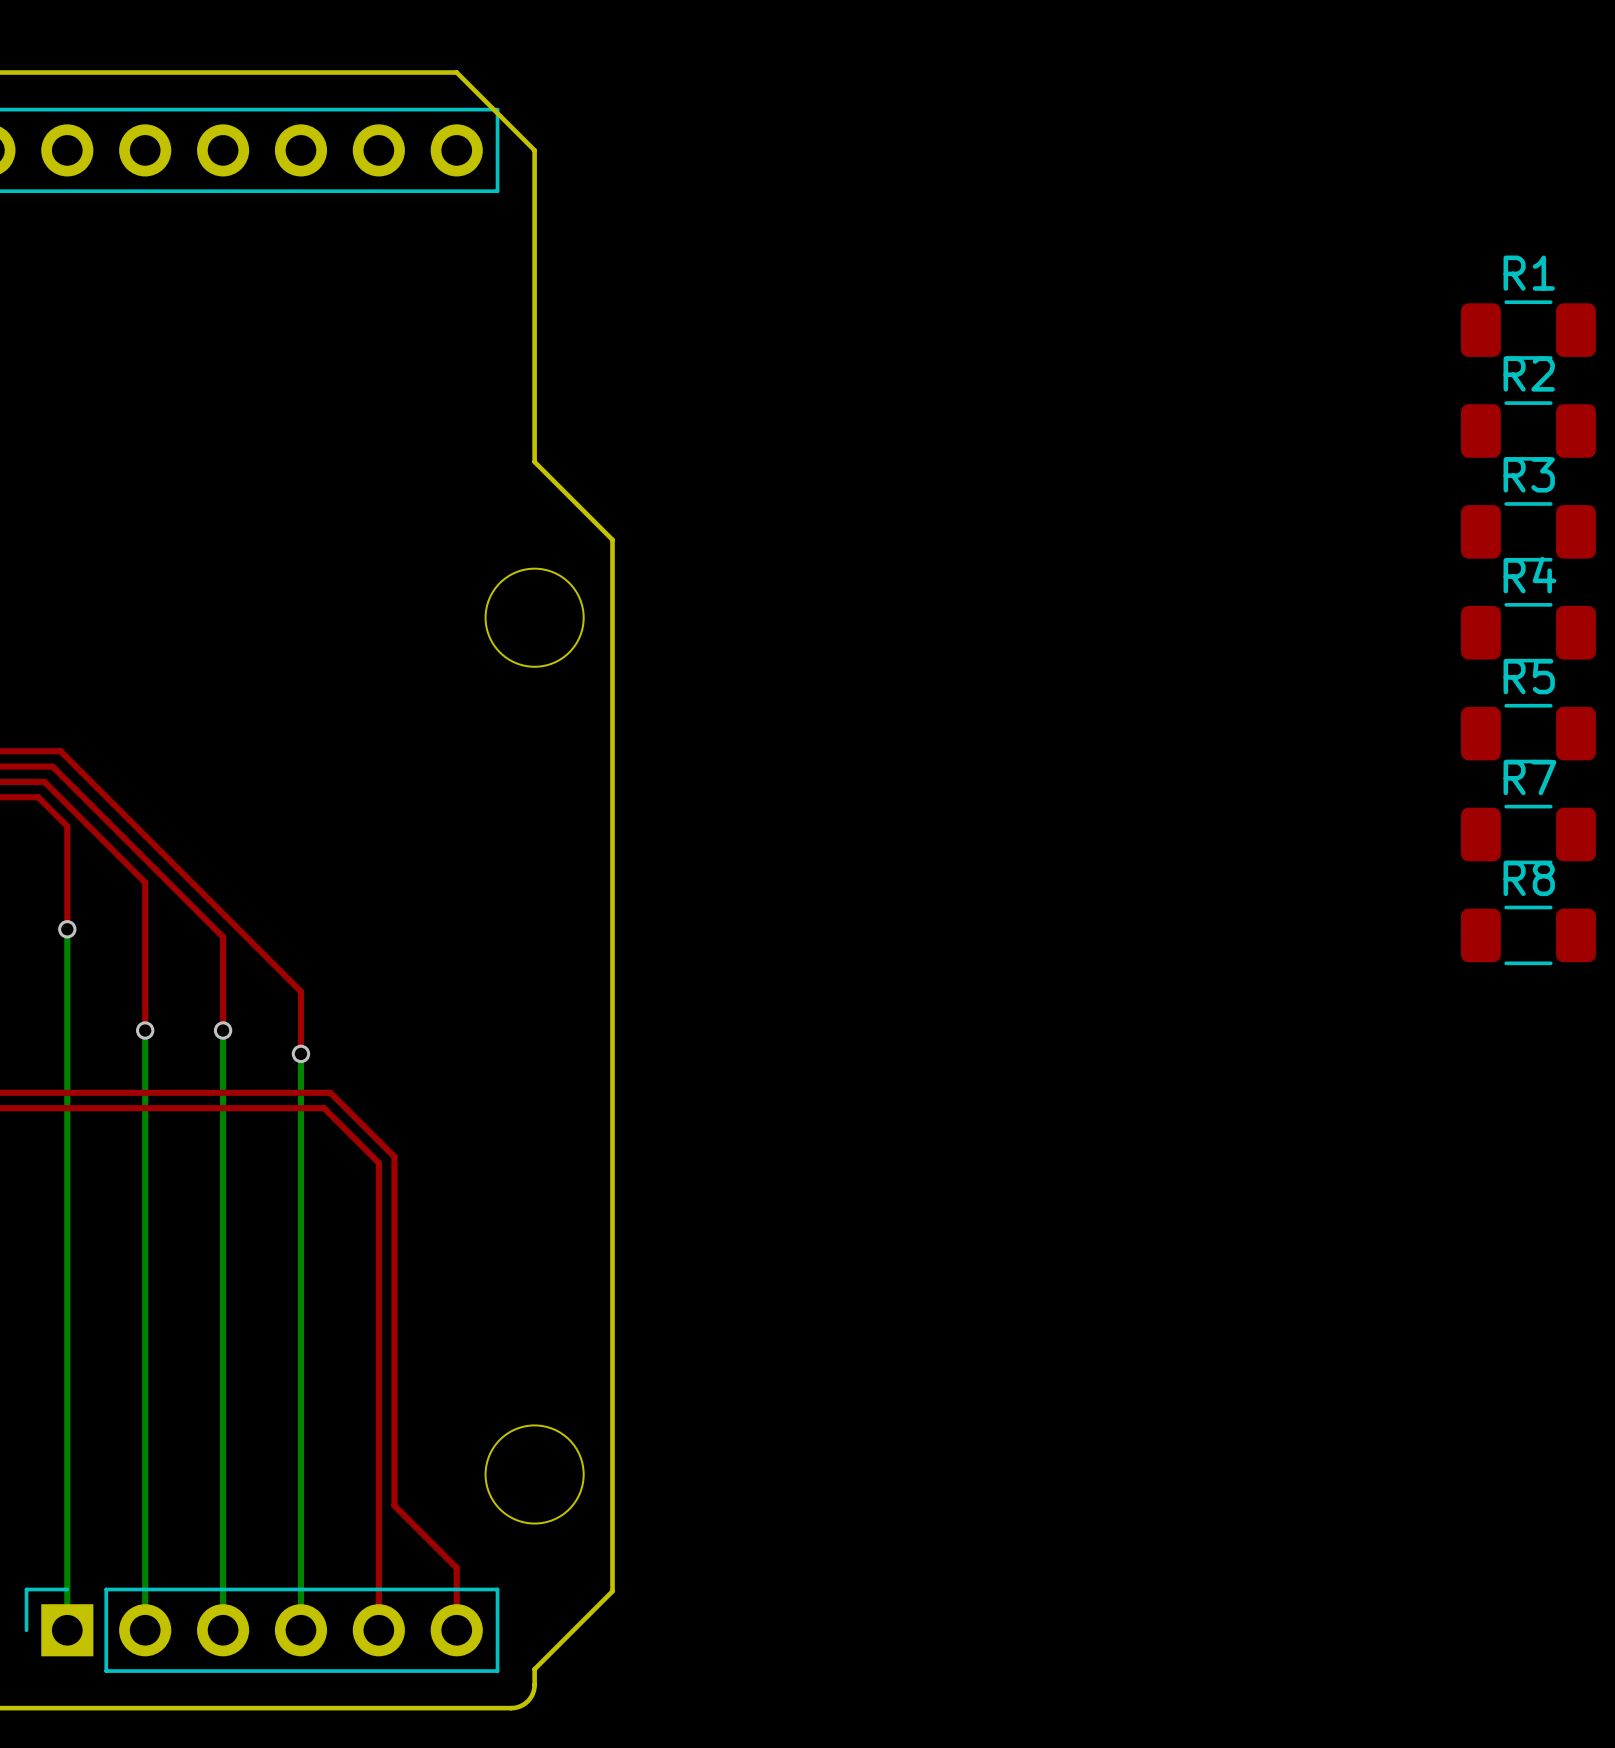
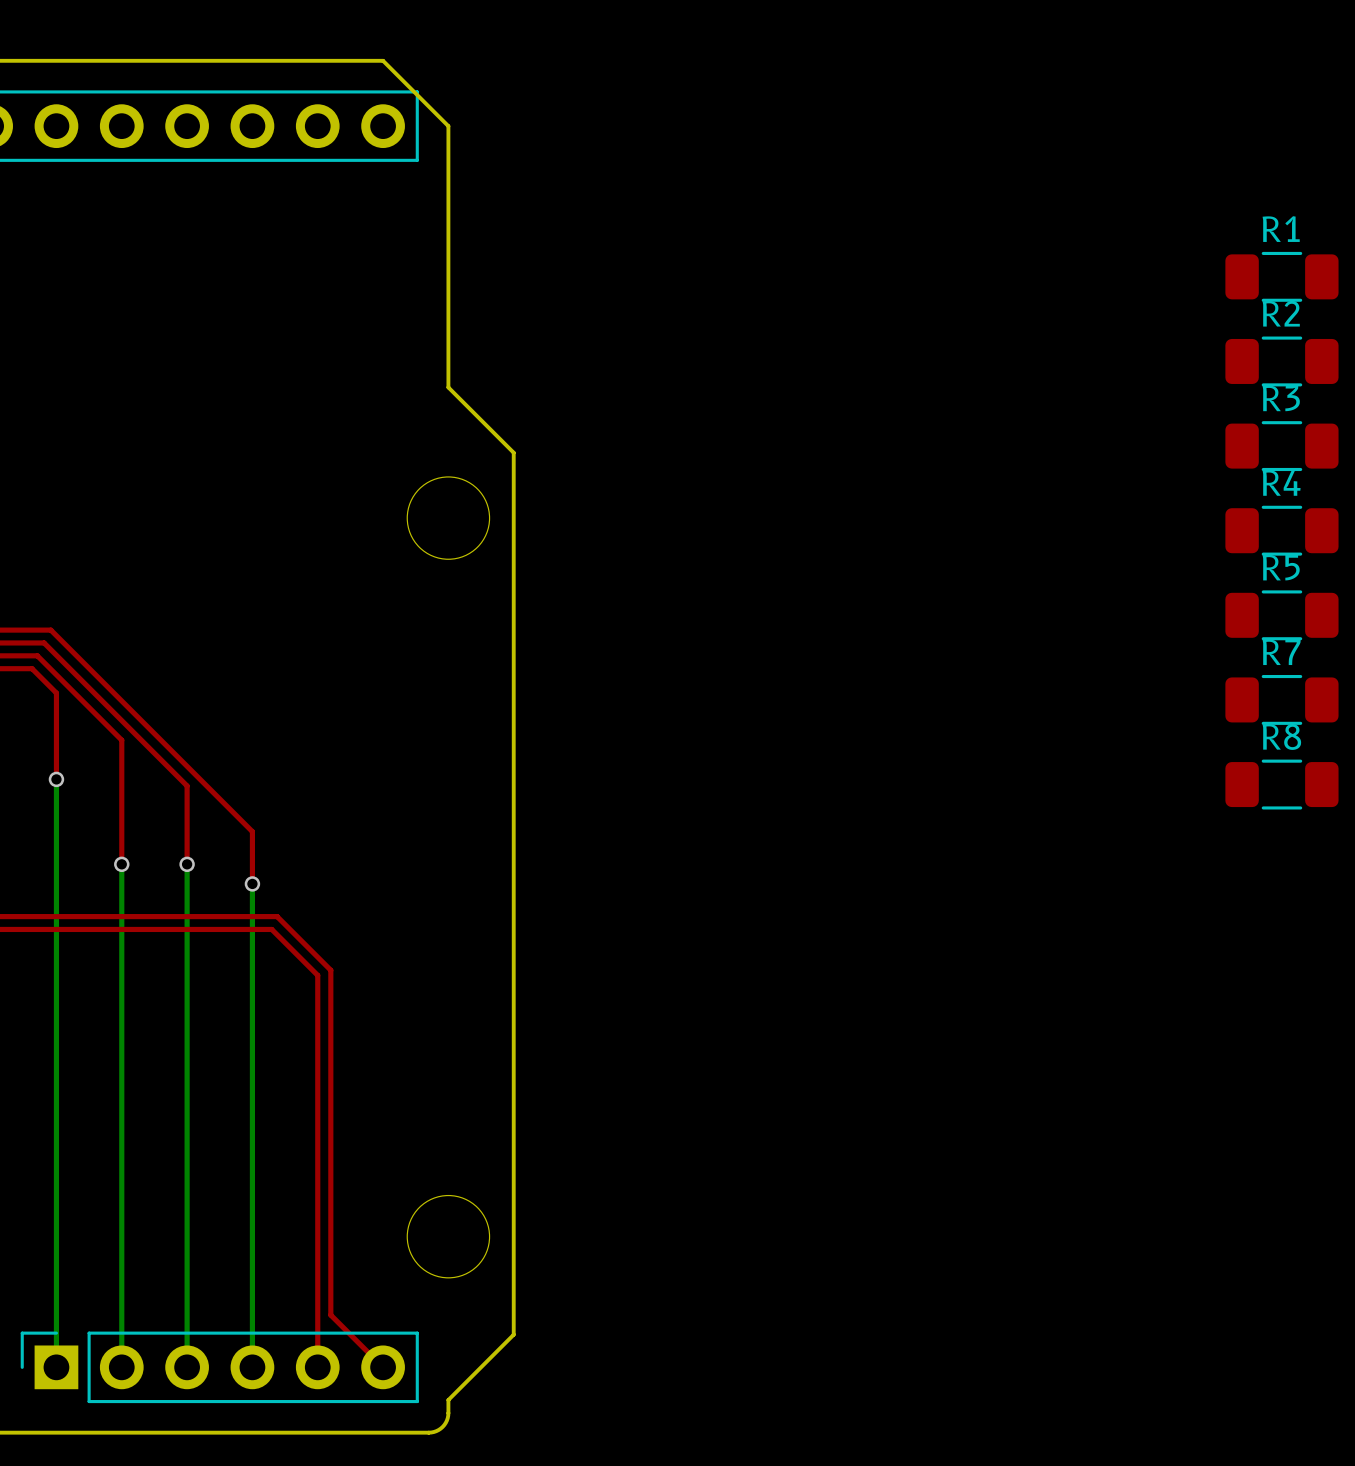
top track: (394, 1505) (456, 1567) (456, 1630) -> (330, 1262) (330, 1315) (383, 1367)

